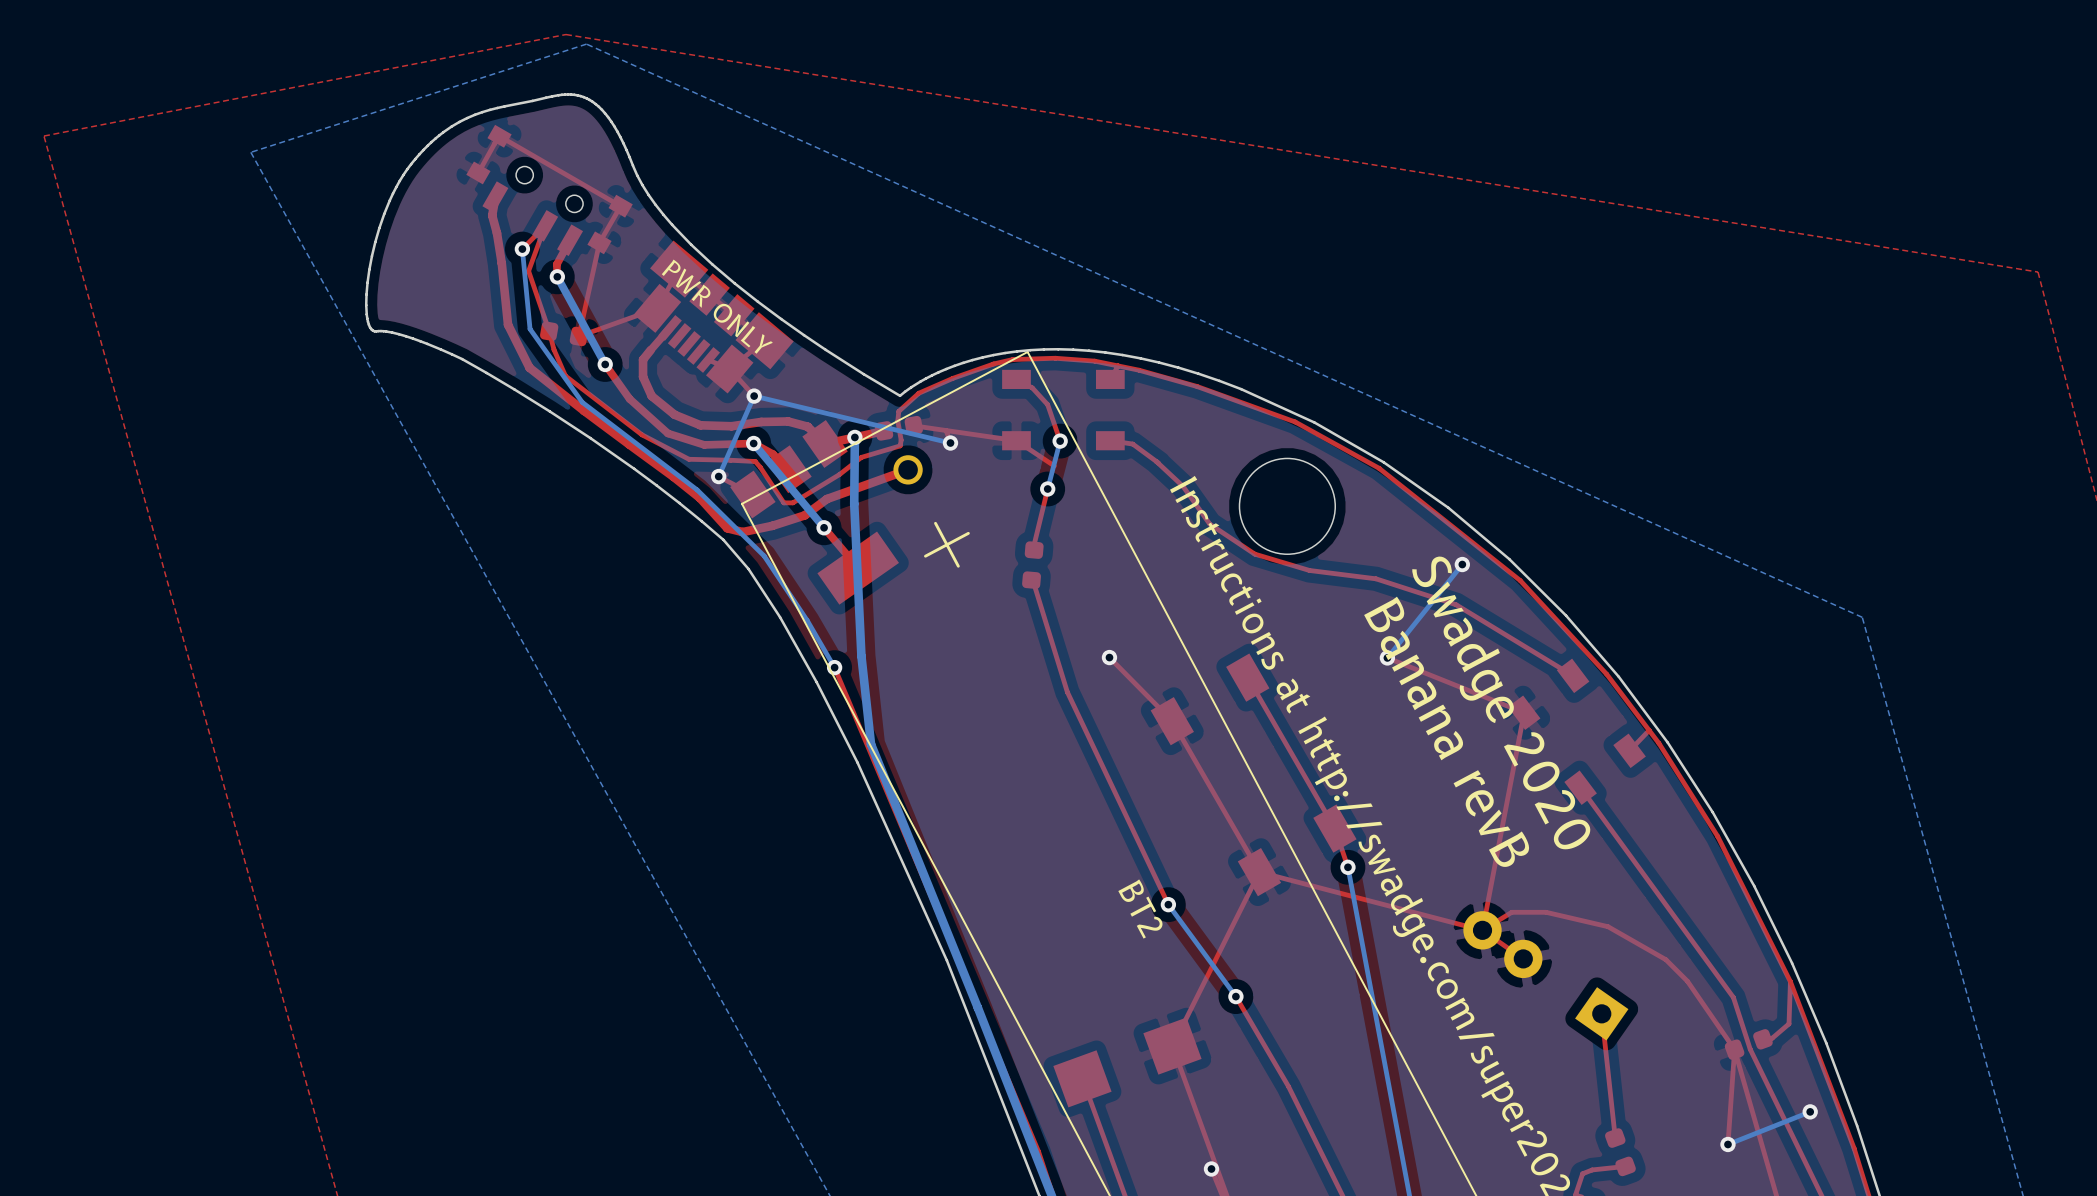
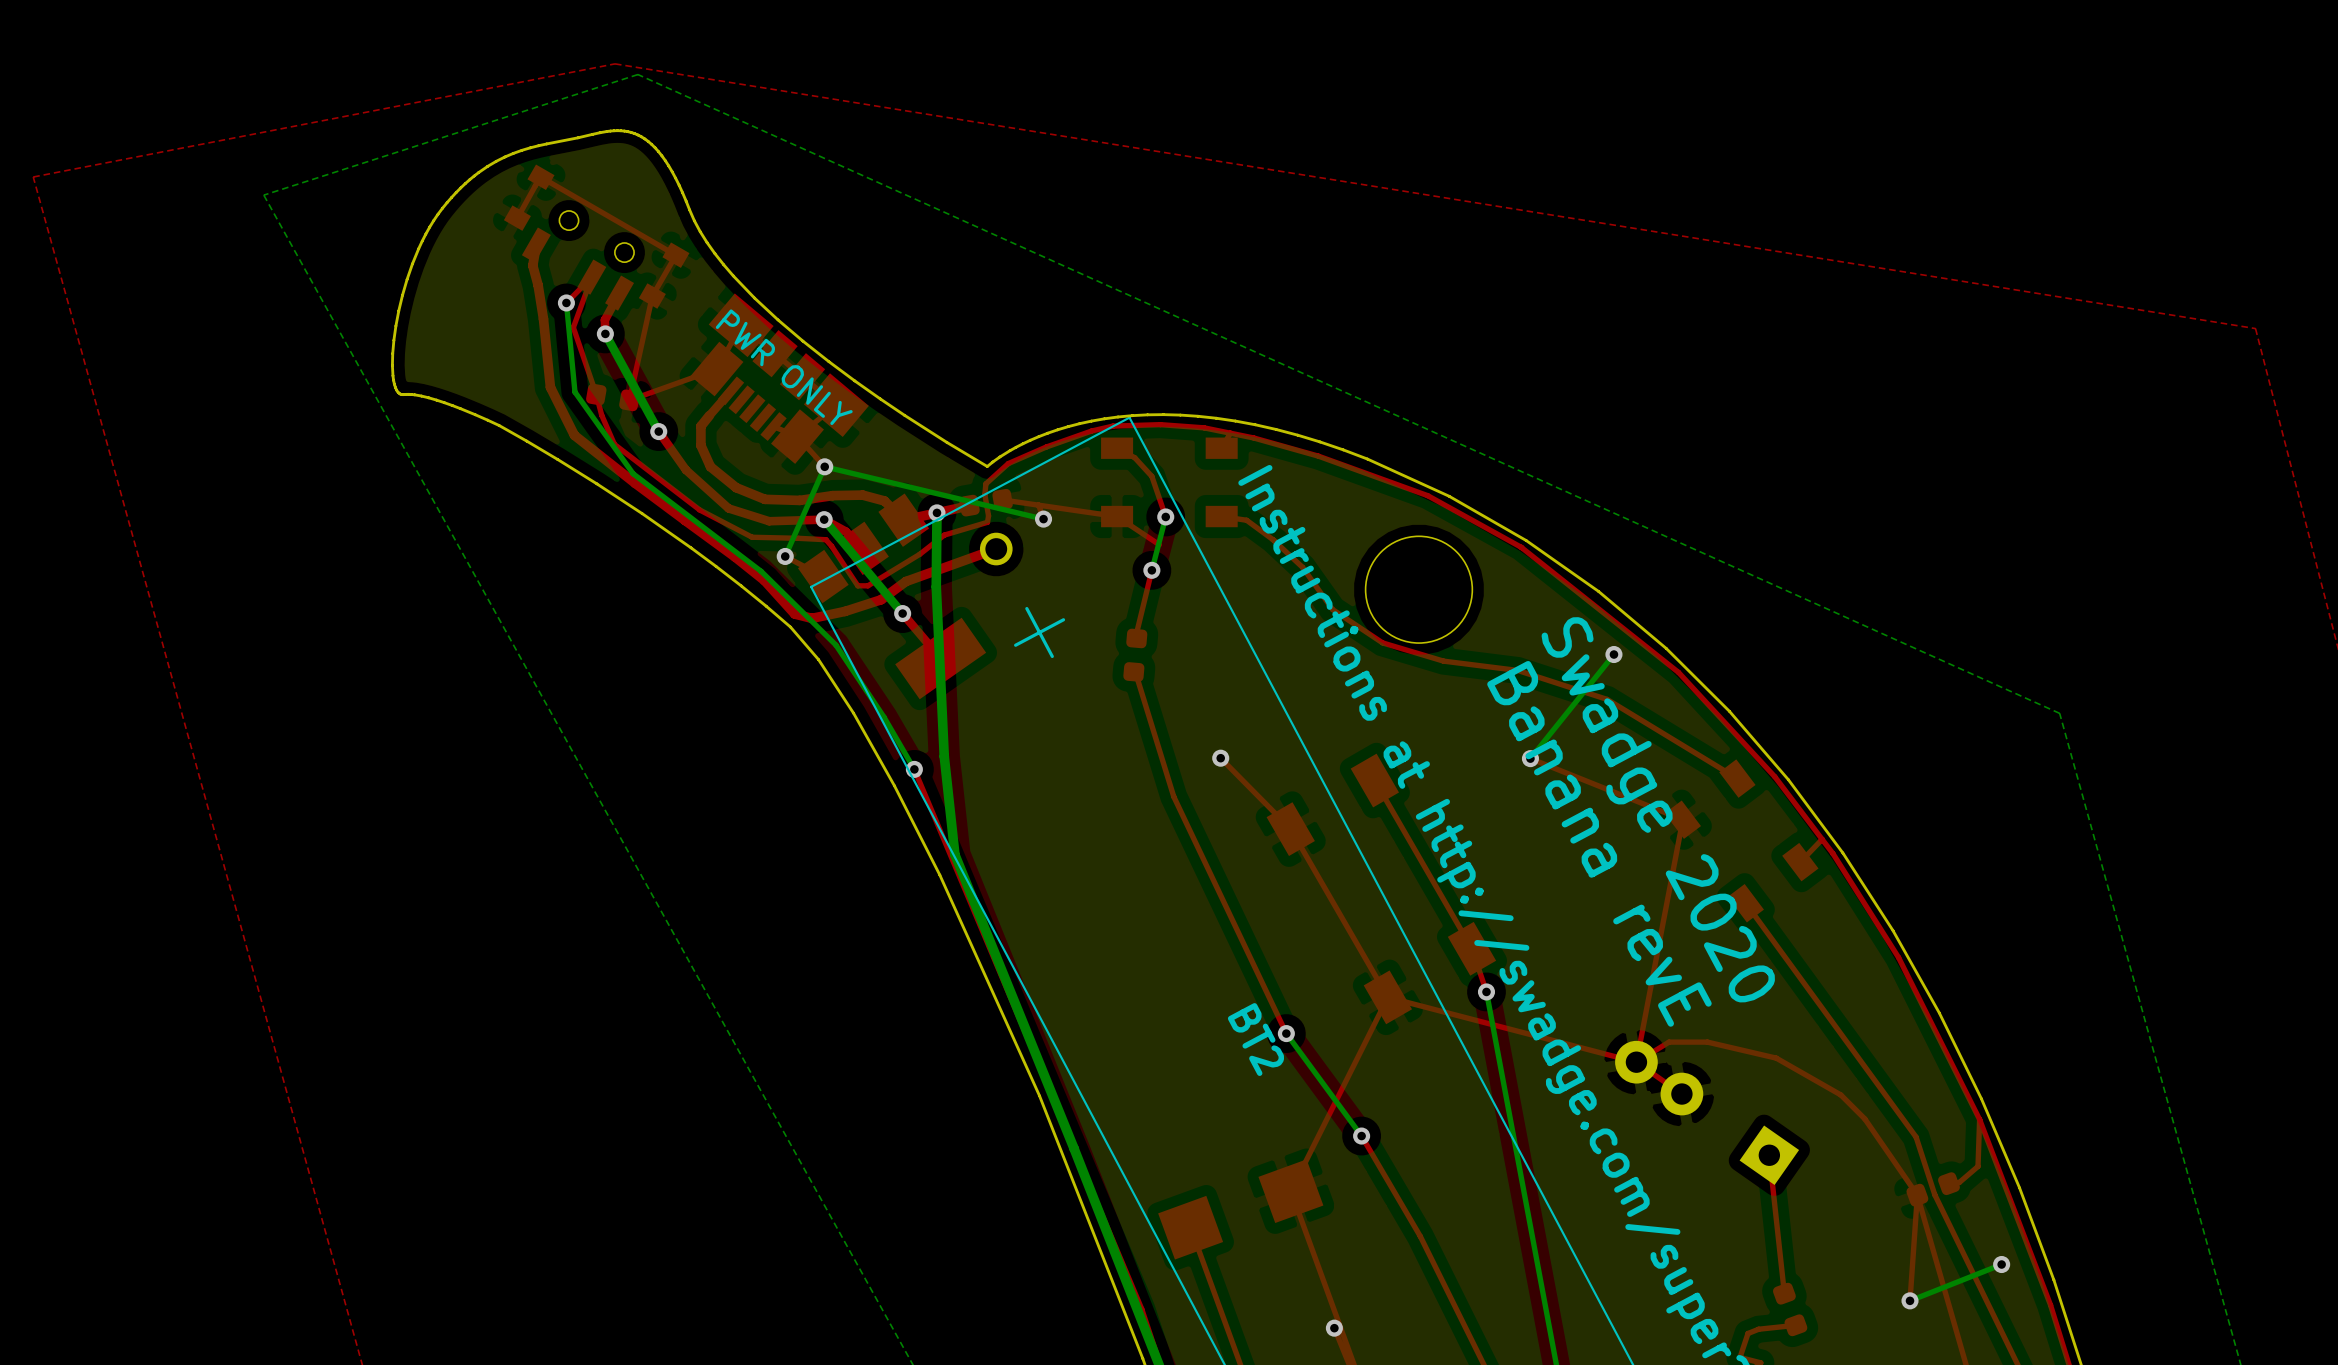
text: Banana revB (1446, 731) -> Banana revE (1599, 843)

